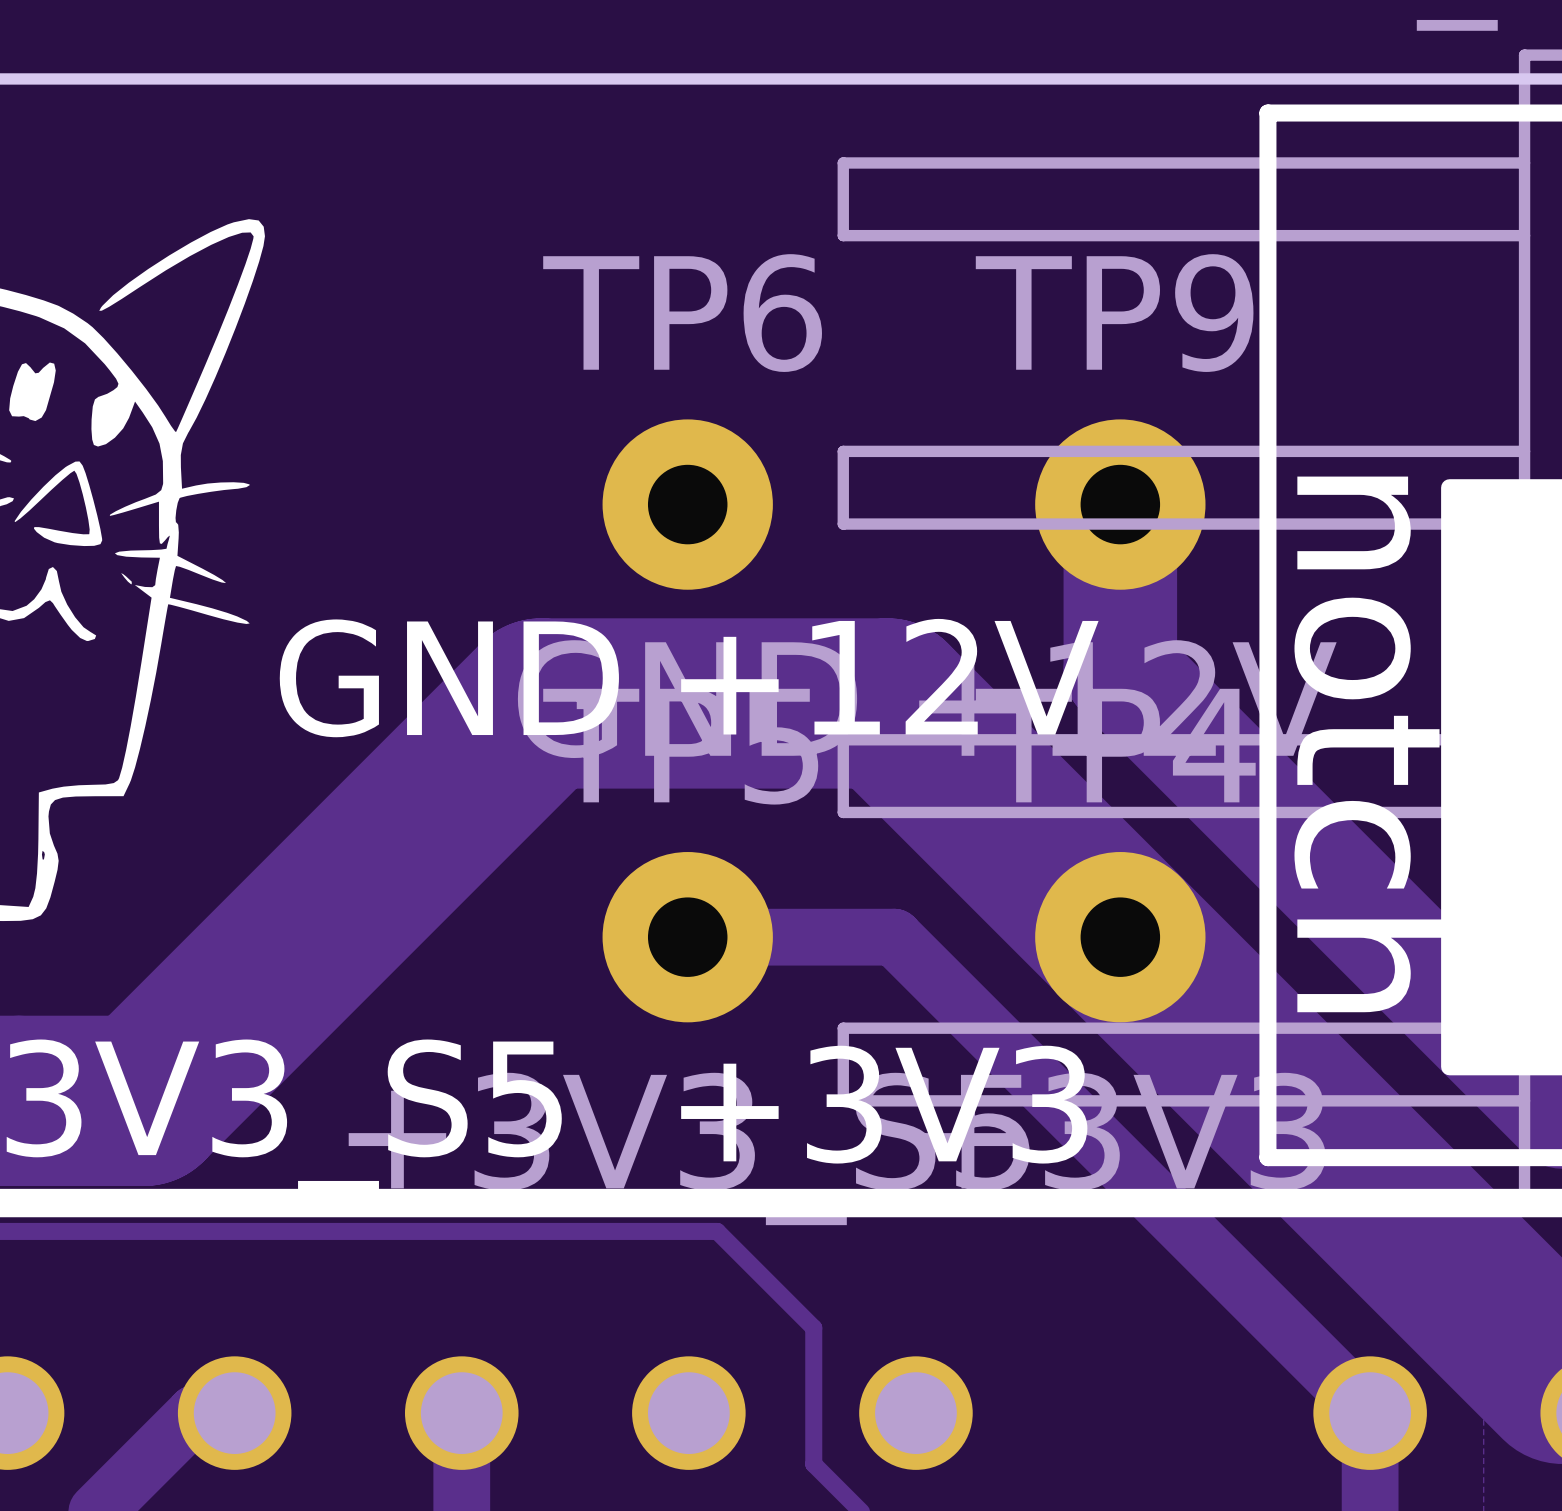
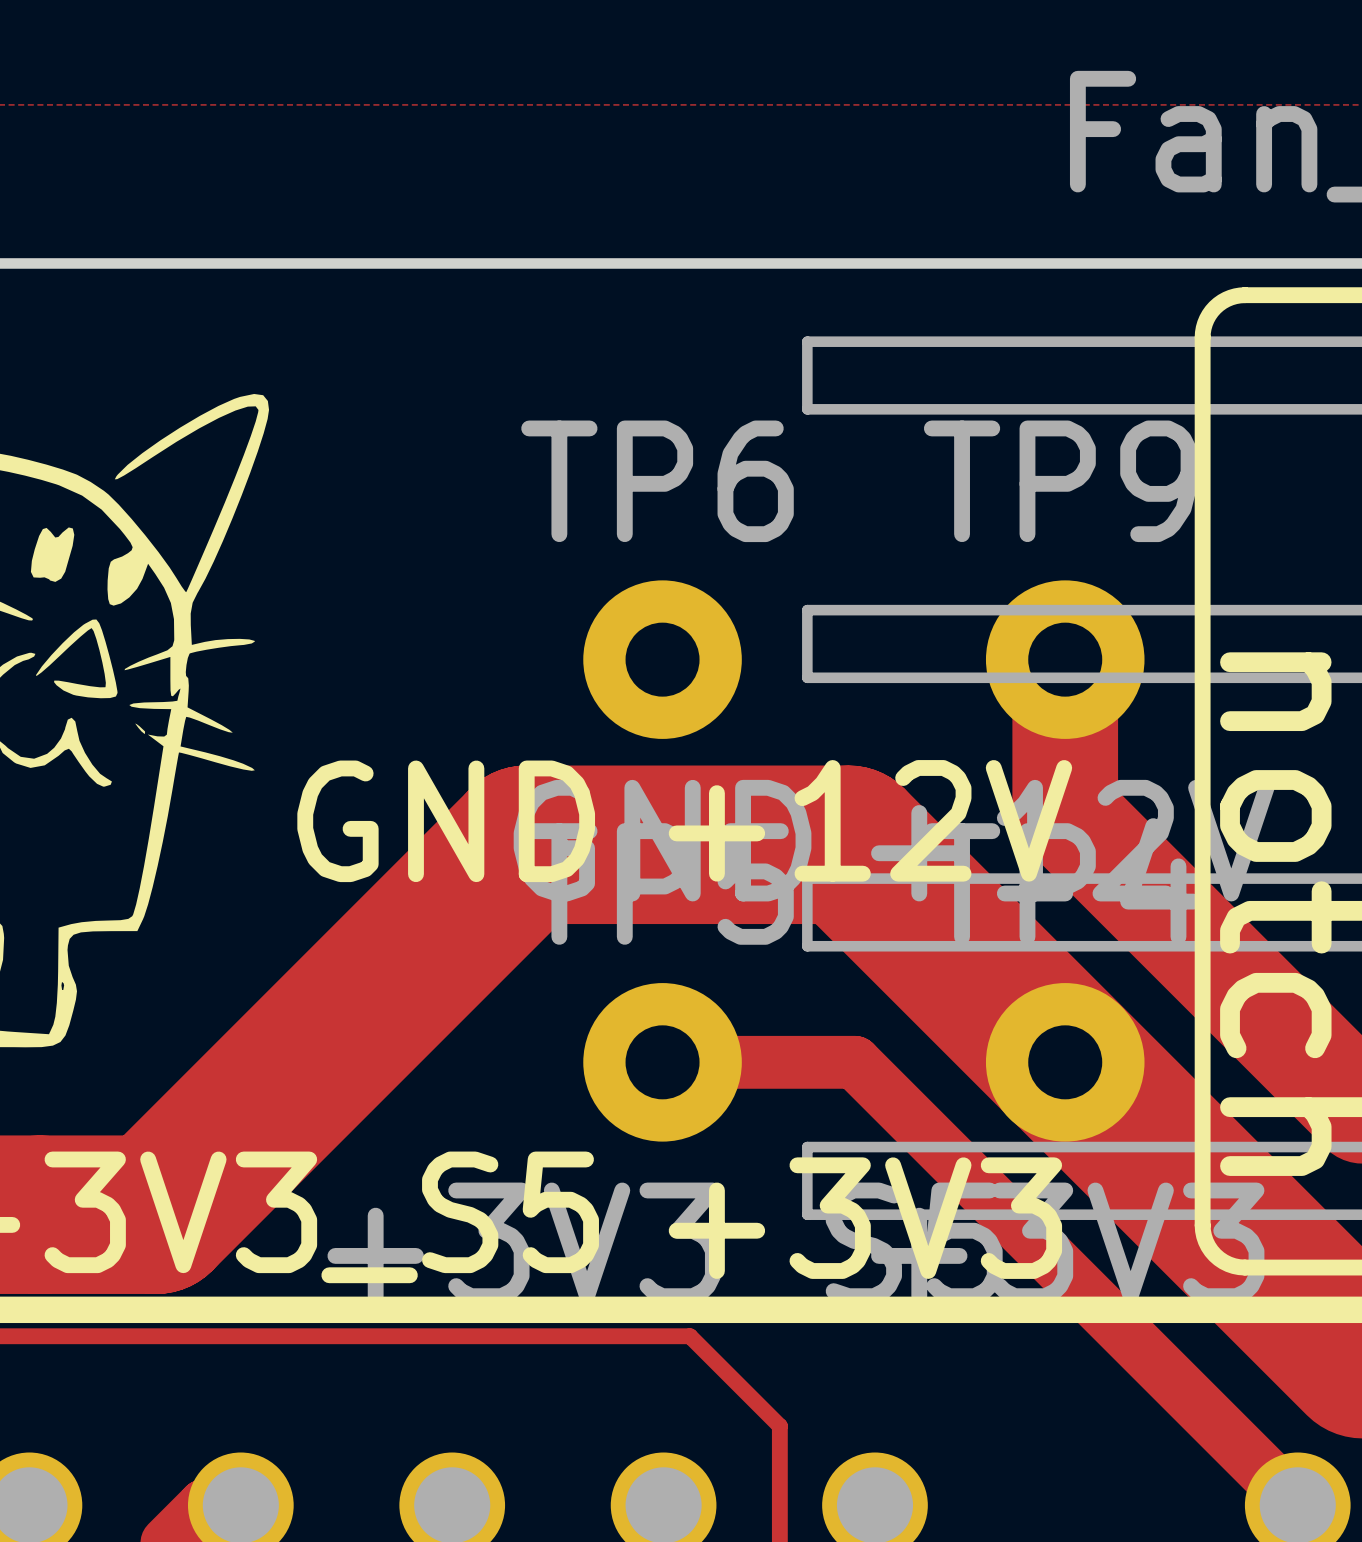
line: (1313, 113) (1267, 113) (1267, 158) -> (1244, 295) (1230, 297) (1215, 307) (1206, 319) (1202, 337)
line: (1267, 1112) (1267, 1157) (1313, 1157) -> (1202, 1225) (1205, 1241) (1215, 1255) (1228, 1264) (1244, 1267)

